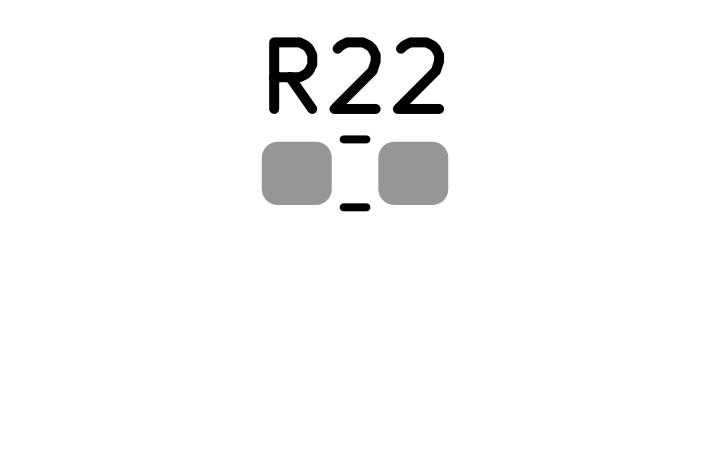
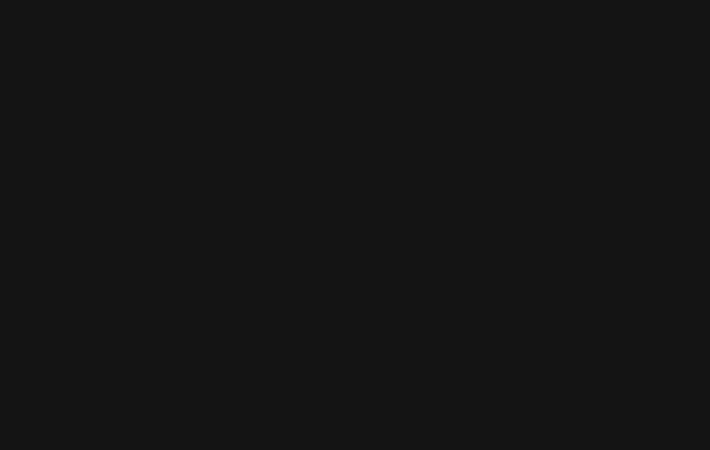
R22: (355, 173) -> none

